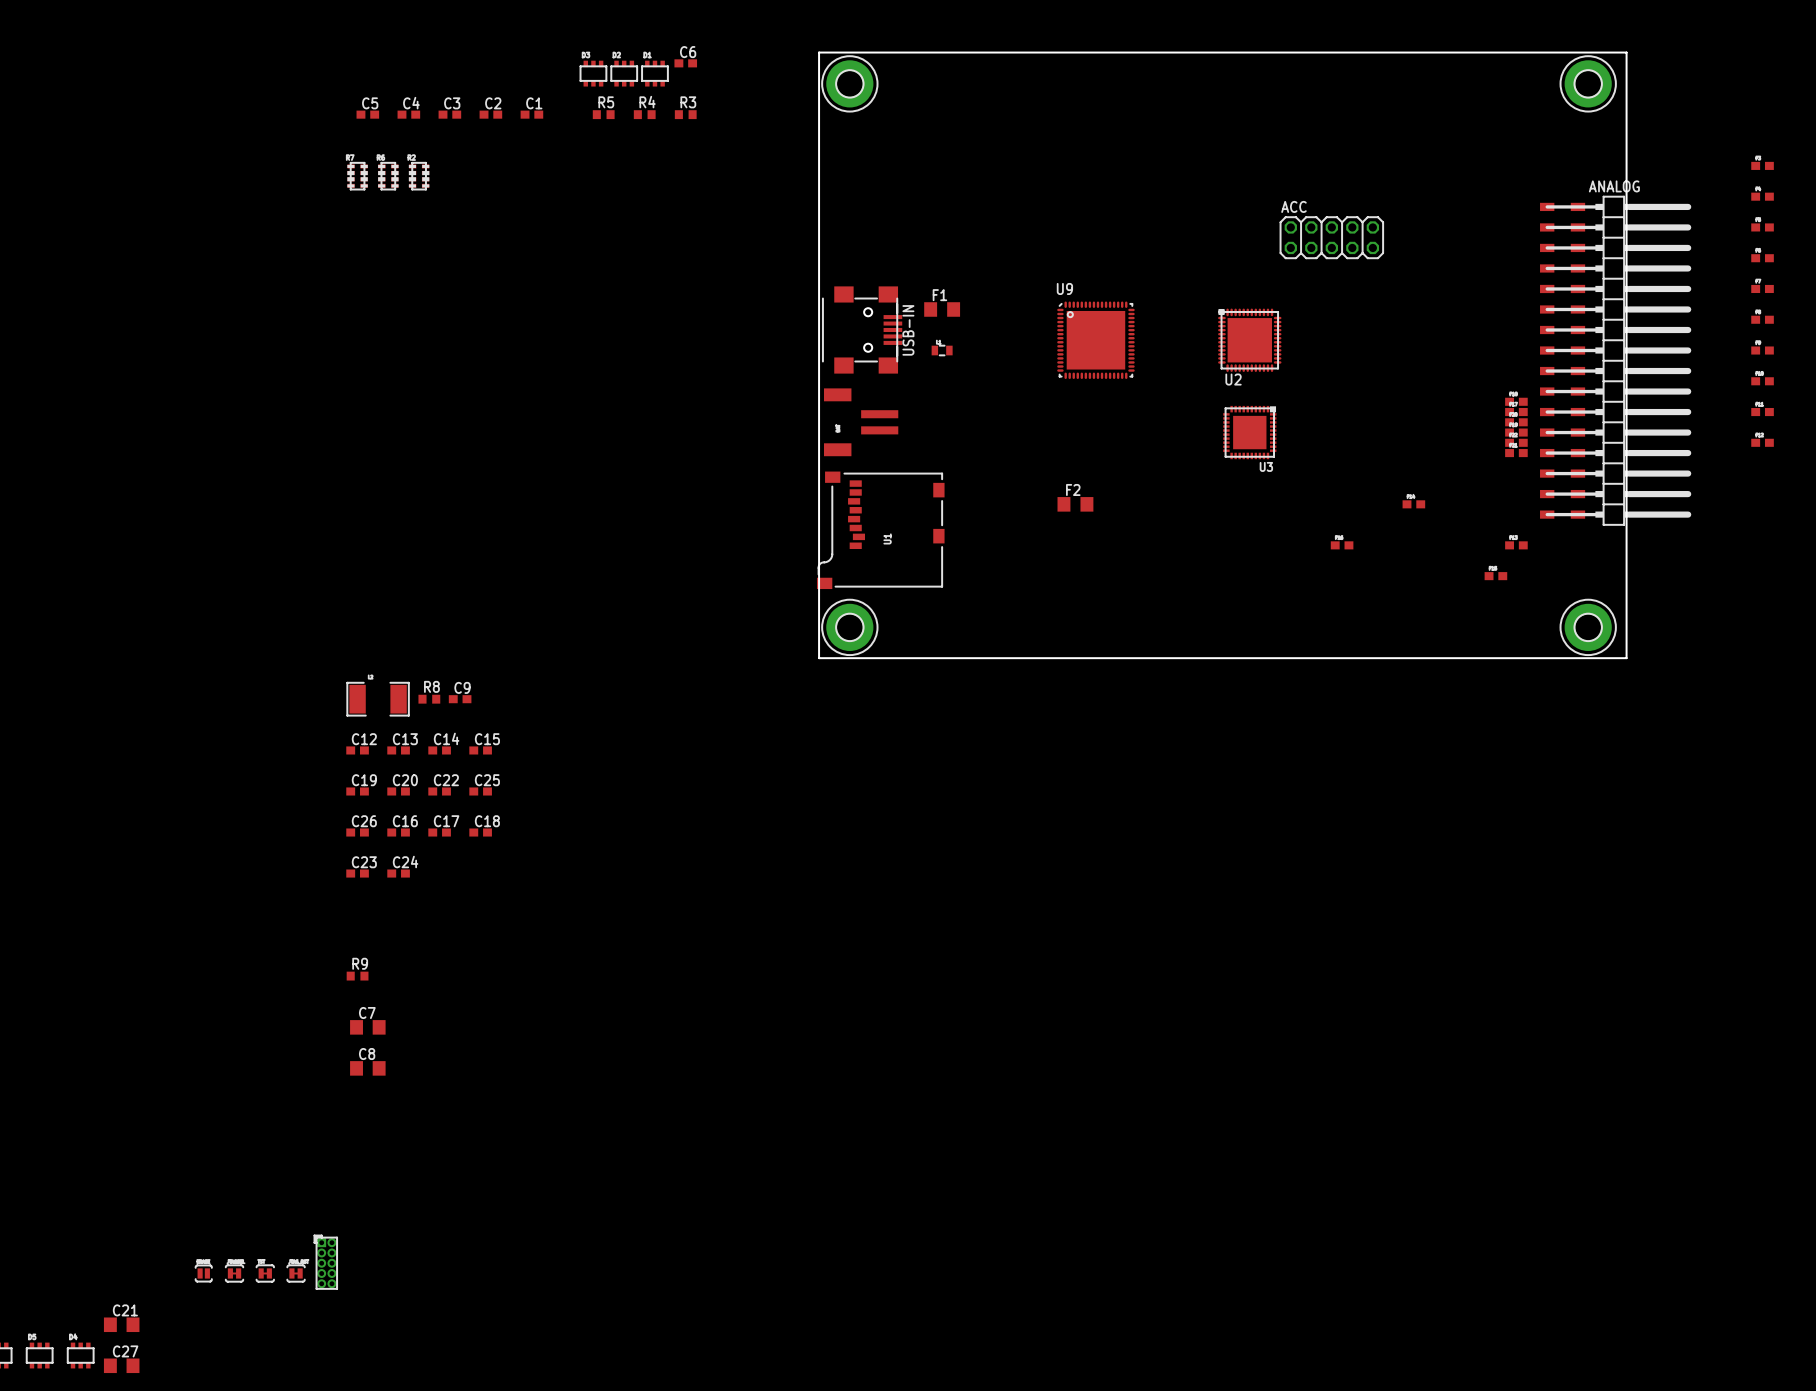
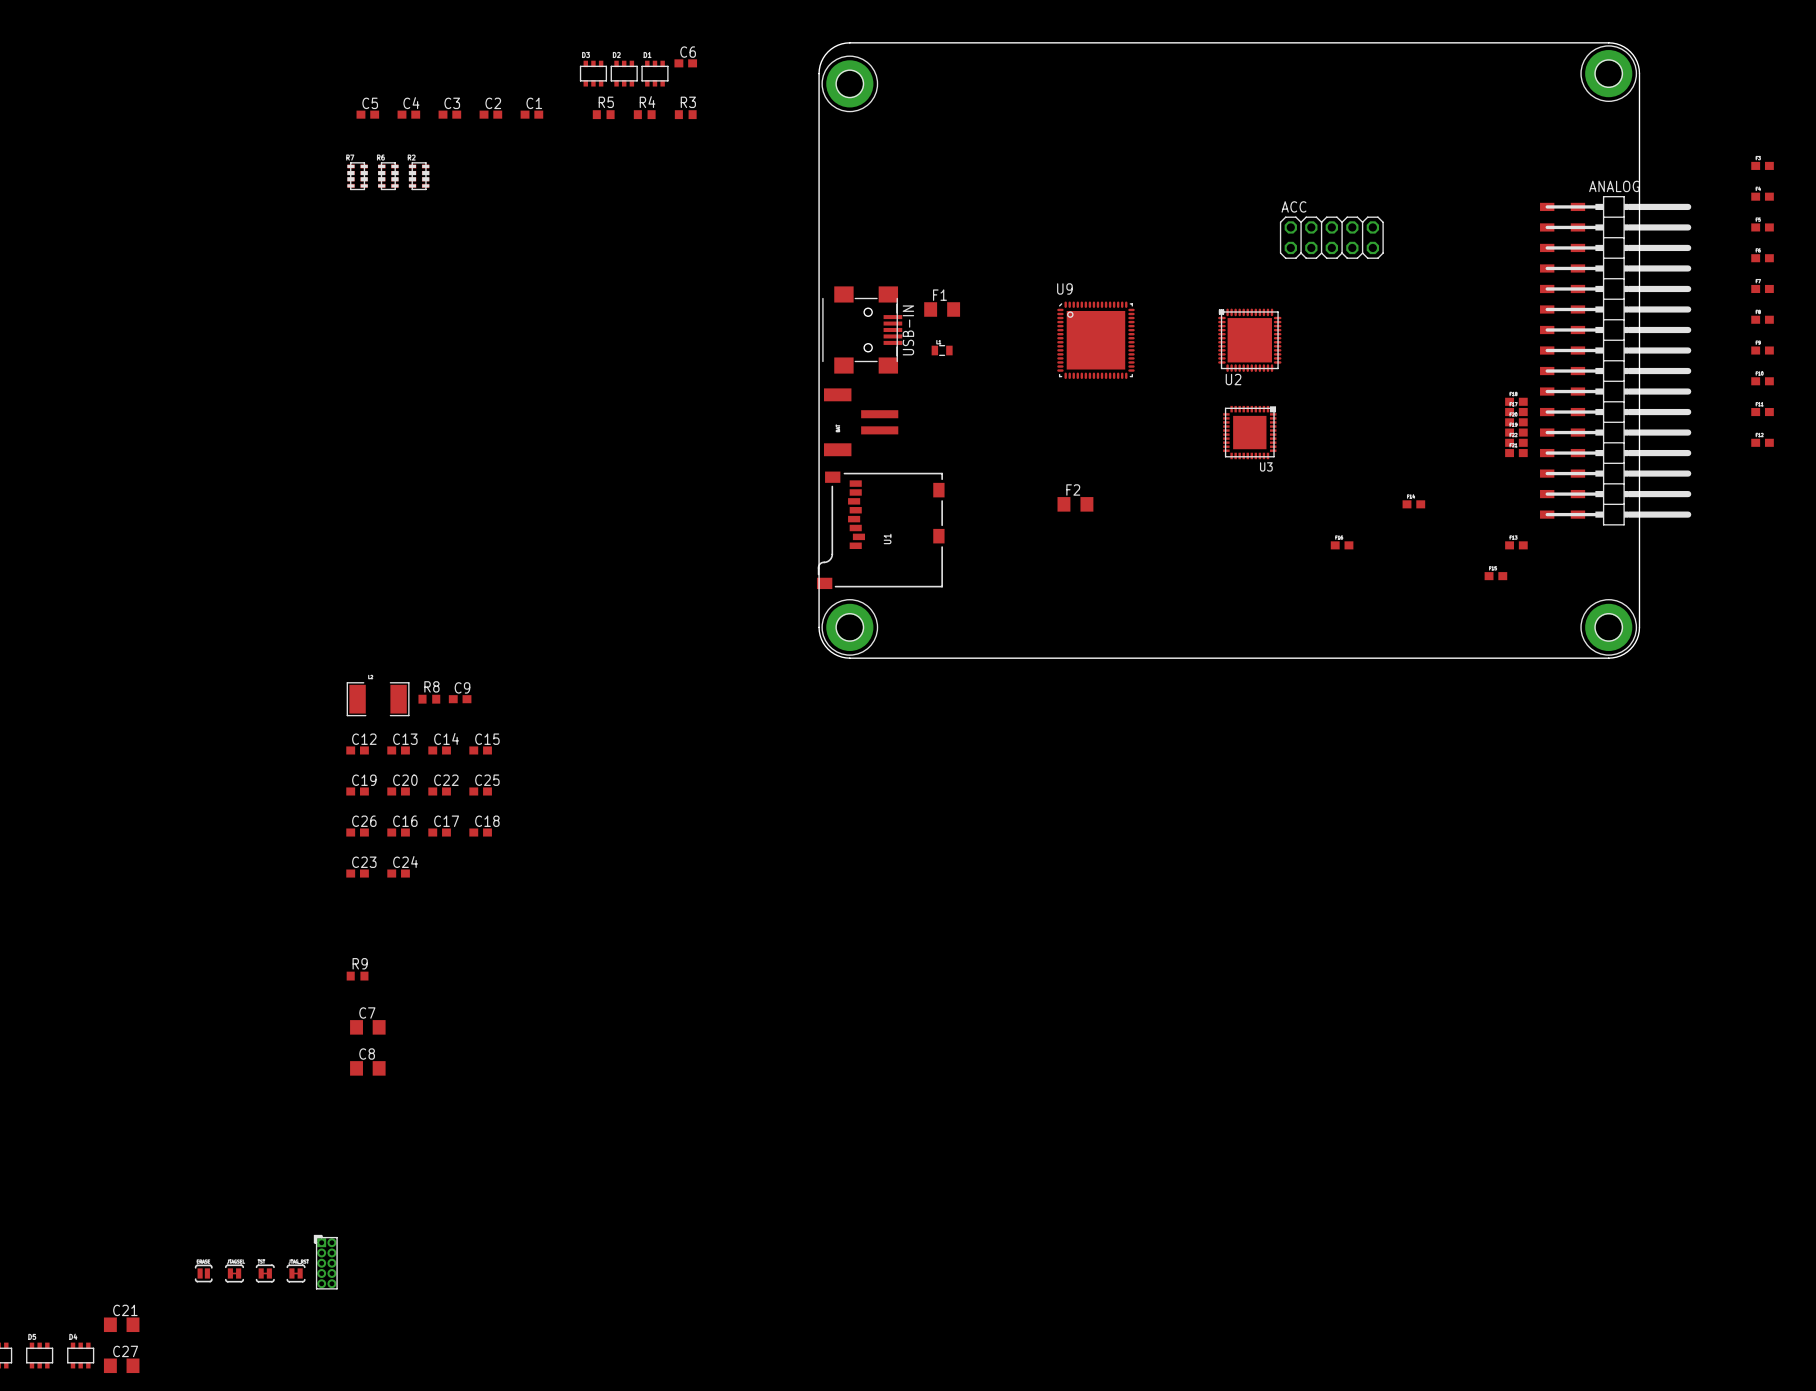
board edge: (819, 73) (819, 52) (1626, 52) (1626, 658) (1608, 658) -> (819, 73) (821, 61) (828, 51) (838, 45) (849, 42) (1608, 42) (1616, 43) (1627, 49) (1635, 58) (1639, 73) (1639, 627) (1637, 639) (1630, 649) (1620, 655) (1608, 658)
part position: (1588, 83) -> (1608, 73)
board edge: (819, 627) (819, 658) (849, 658) -> (819, 627) (821, 639) (828, 649) (838, 655) (849, 658)
part position: (1588, 627) -> (1608, 627)

